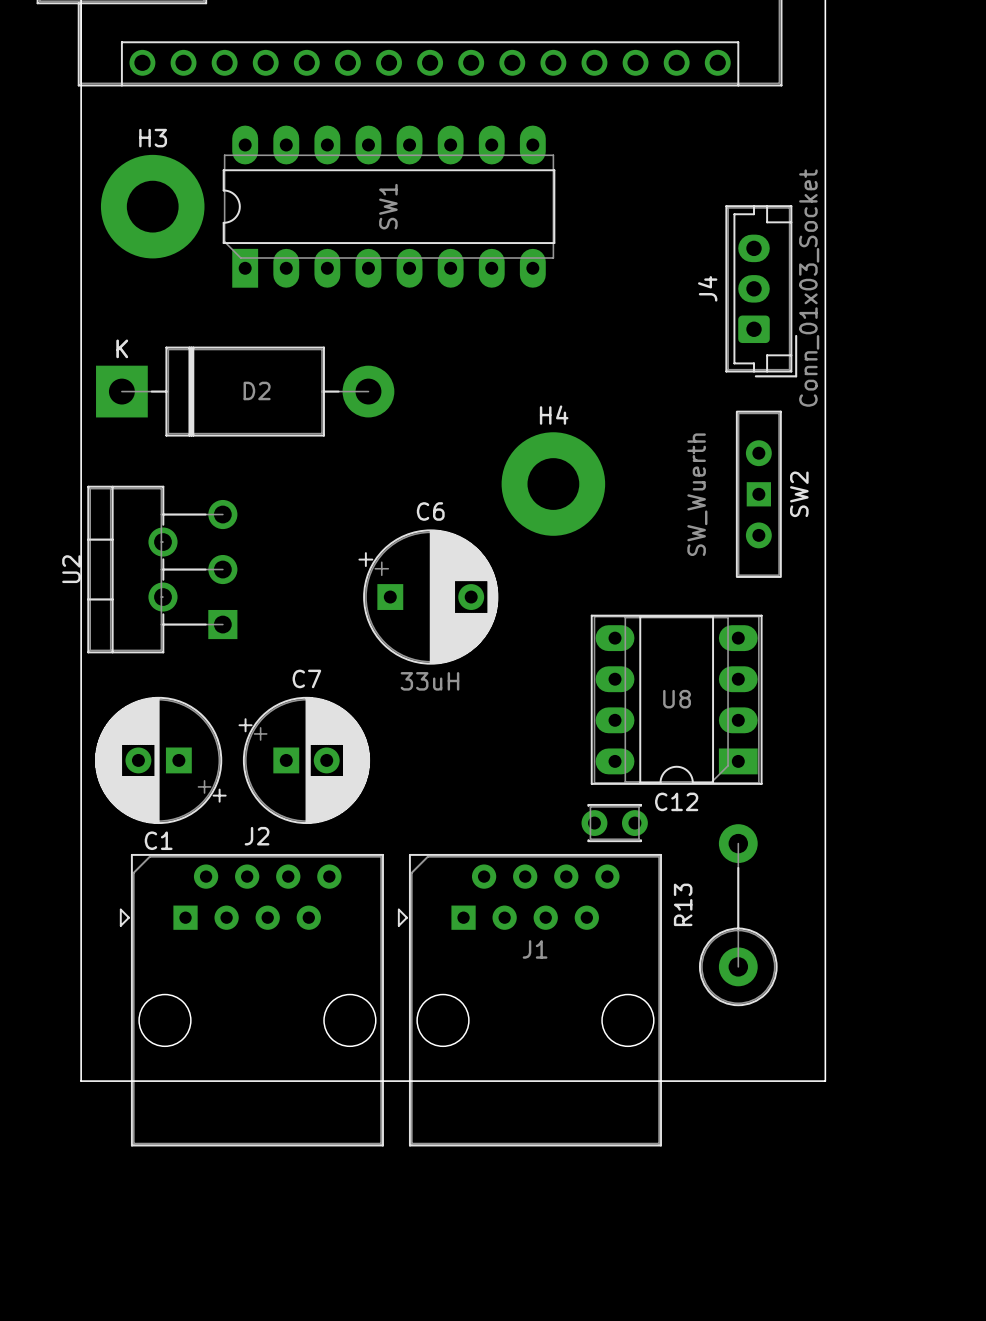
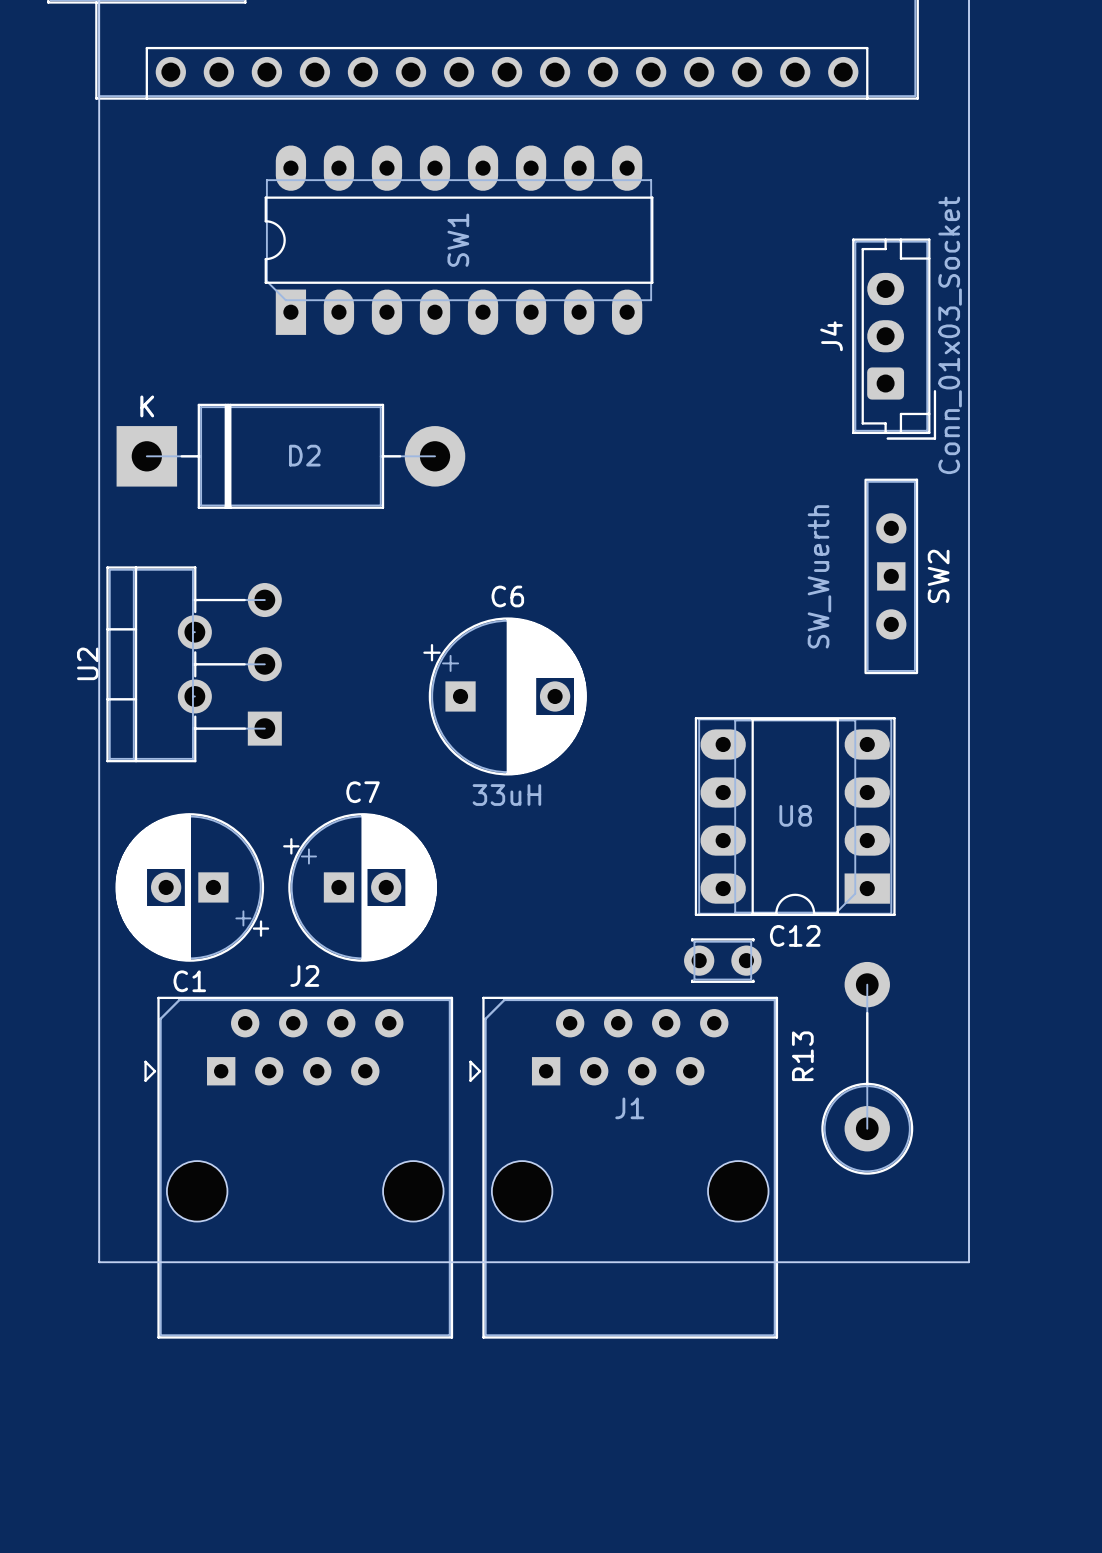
H3: (152, 206) -> none
H4: (553, 484) -> none

